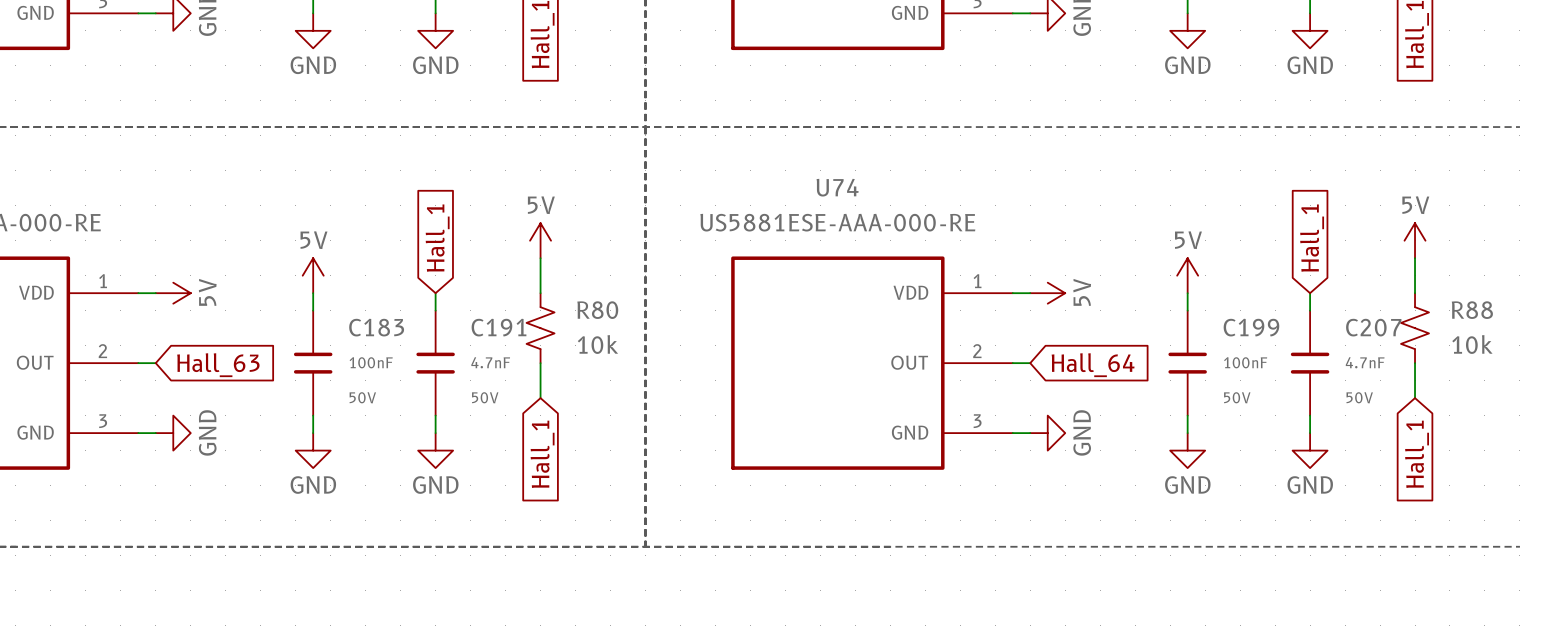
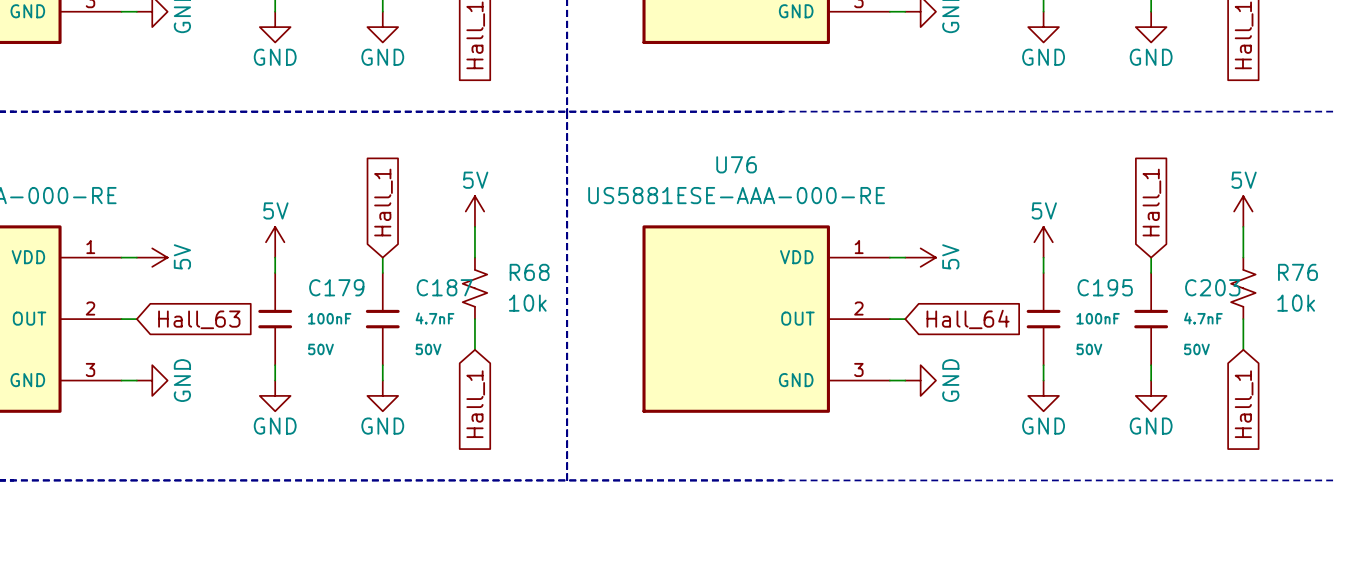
U74 name: U74 (837, 187) -> U76 (736, 164)
R80 name: R80 (597, 310) -> R68 (529, 272)
R88 name: R88 (1472, 310) -> R76 (1297, 272)
C183 name: C183 (376, 327) -> C179 (336, 287)
C191 name: C191 (499, 327) -> C187 (444, 287)
C199 name: C199 (1251, 327) -> C195 (1105, 287)
C207 name: C207 (1373, 327) -> C203 (1212, 287)

